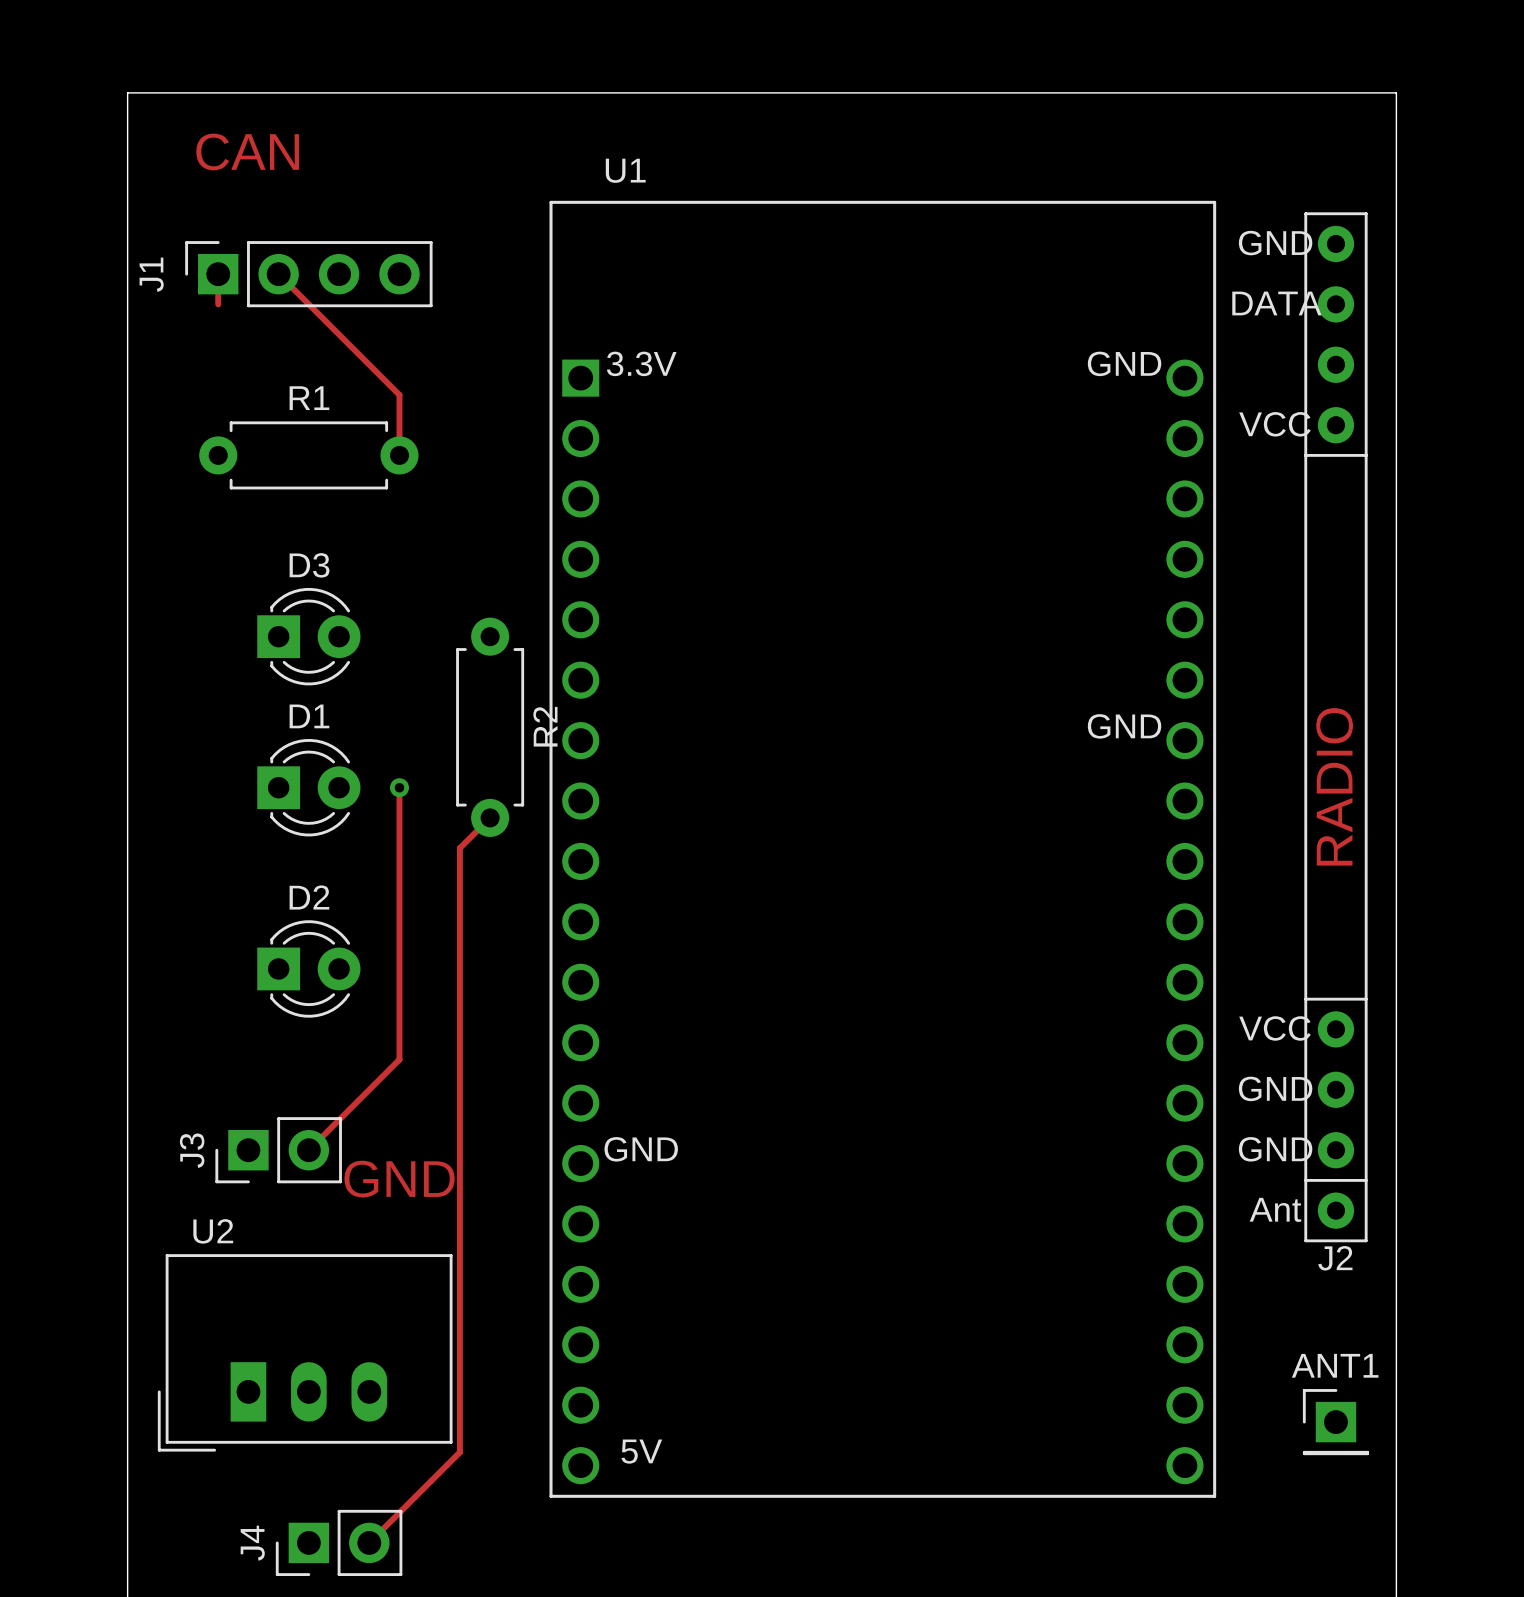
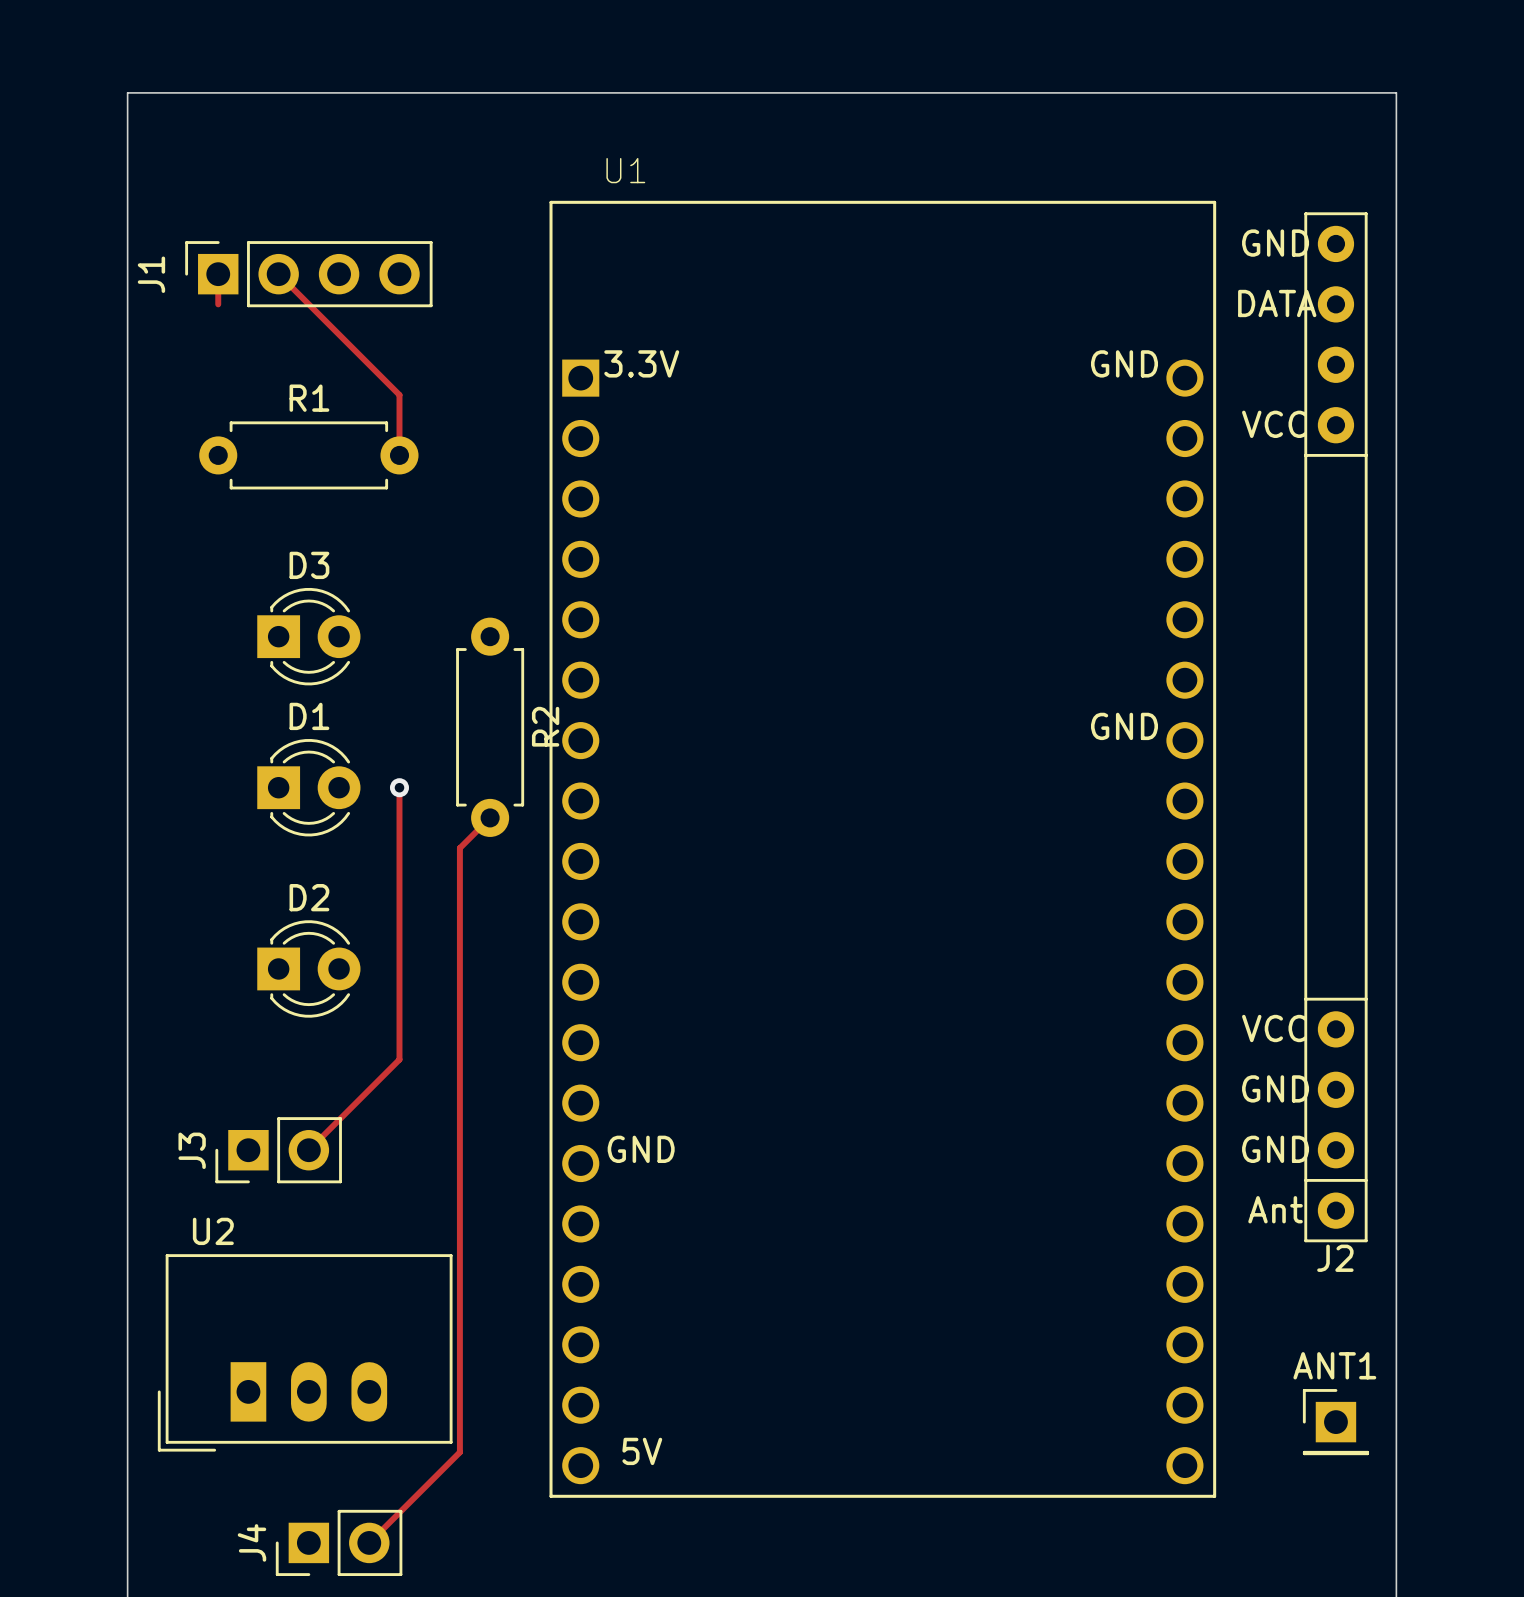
text: CAN (247, 151) -> none
text: RADIO (1334, 786) -> none
text: GND (399, 1179) -> none

